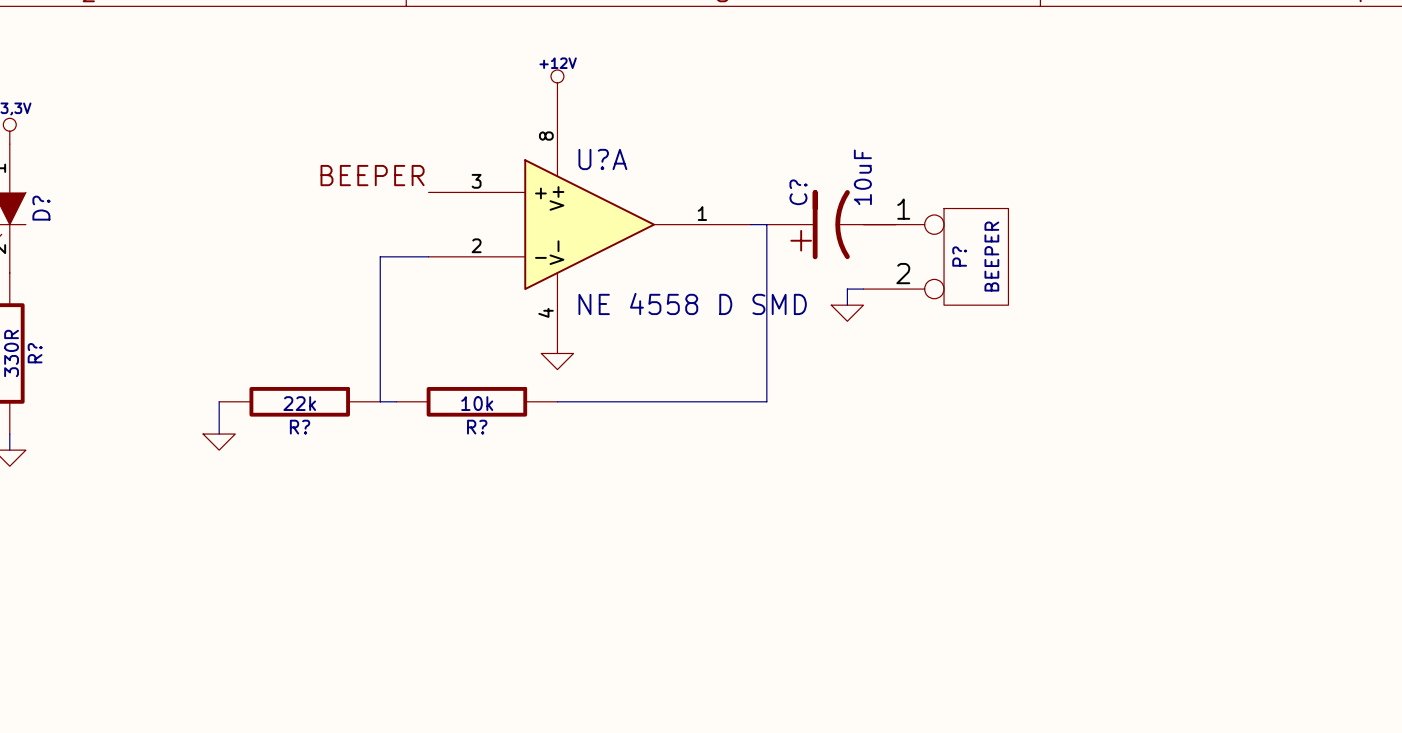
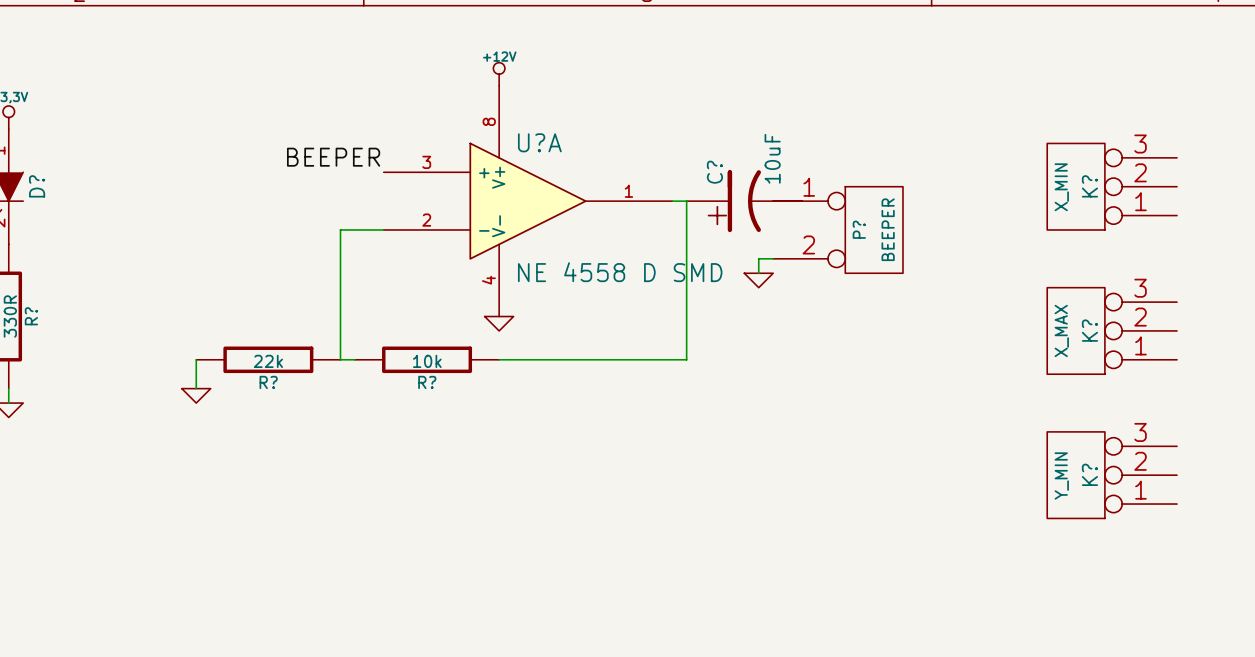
K?: none -> X_MIN (1112, 186)
K?: none -> X_MAX (1112, 330)
K?: none -> Y_MIN (1112, 475)

